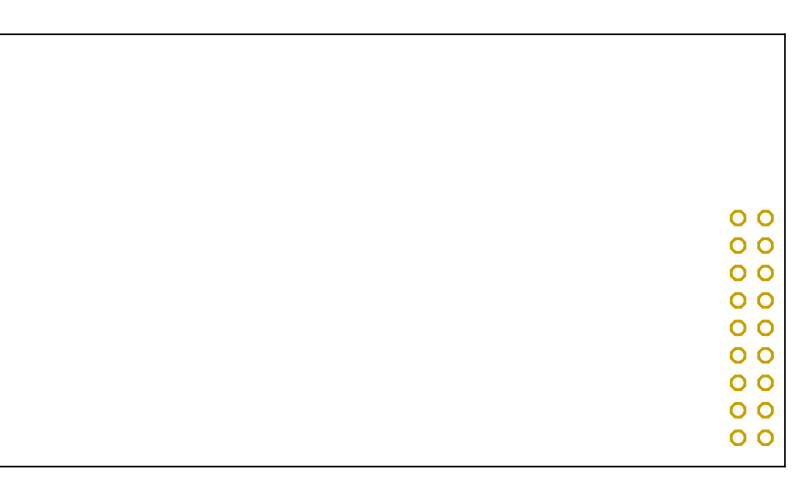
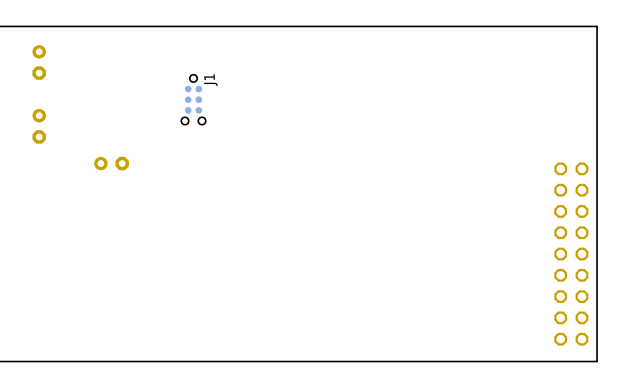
part: none -> (39, 62)
J1: none -> (193, 99)
part: none -> (39, 126)
part: none -> (111, 163)

